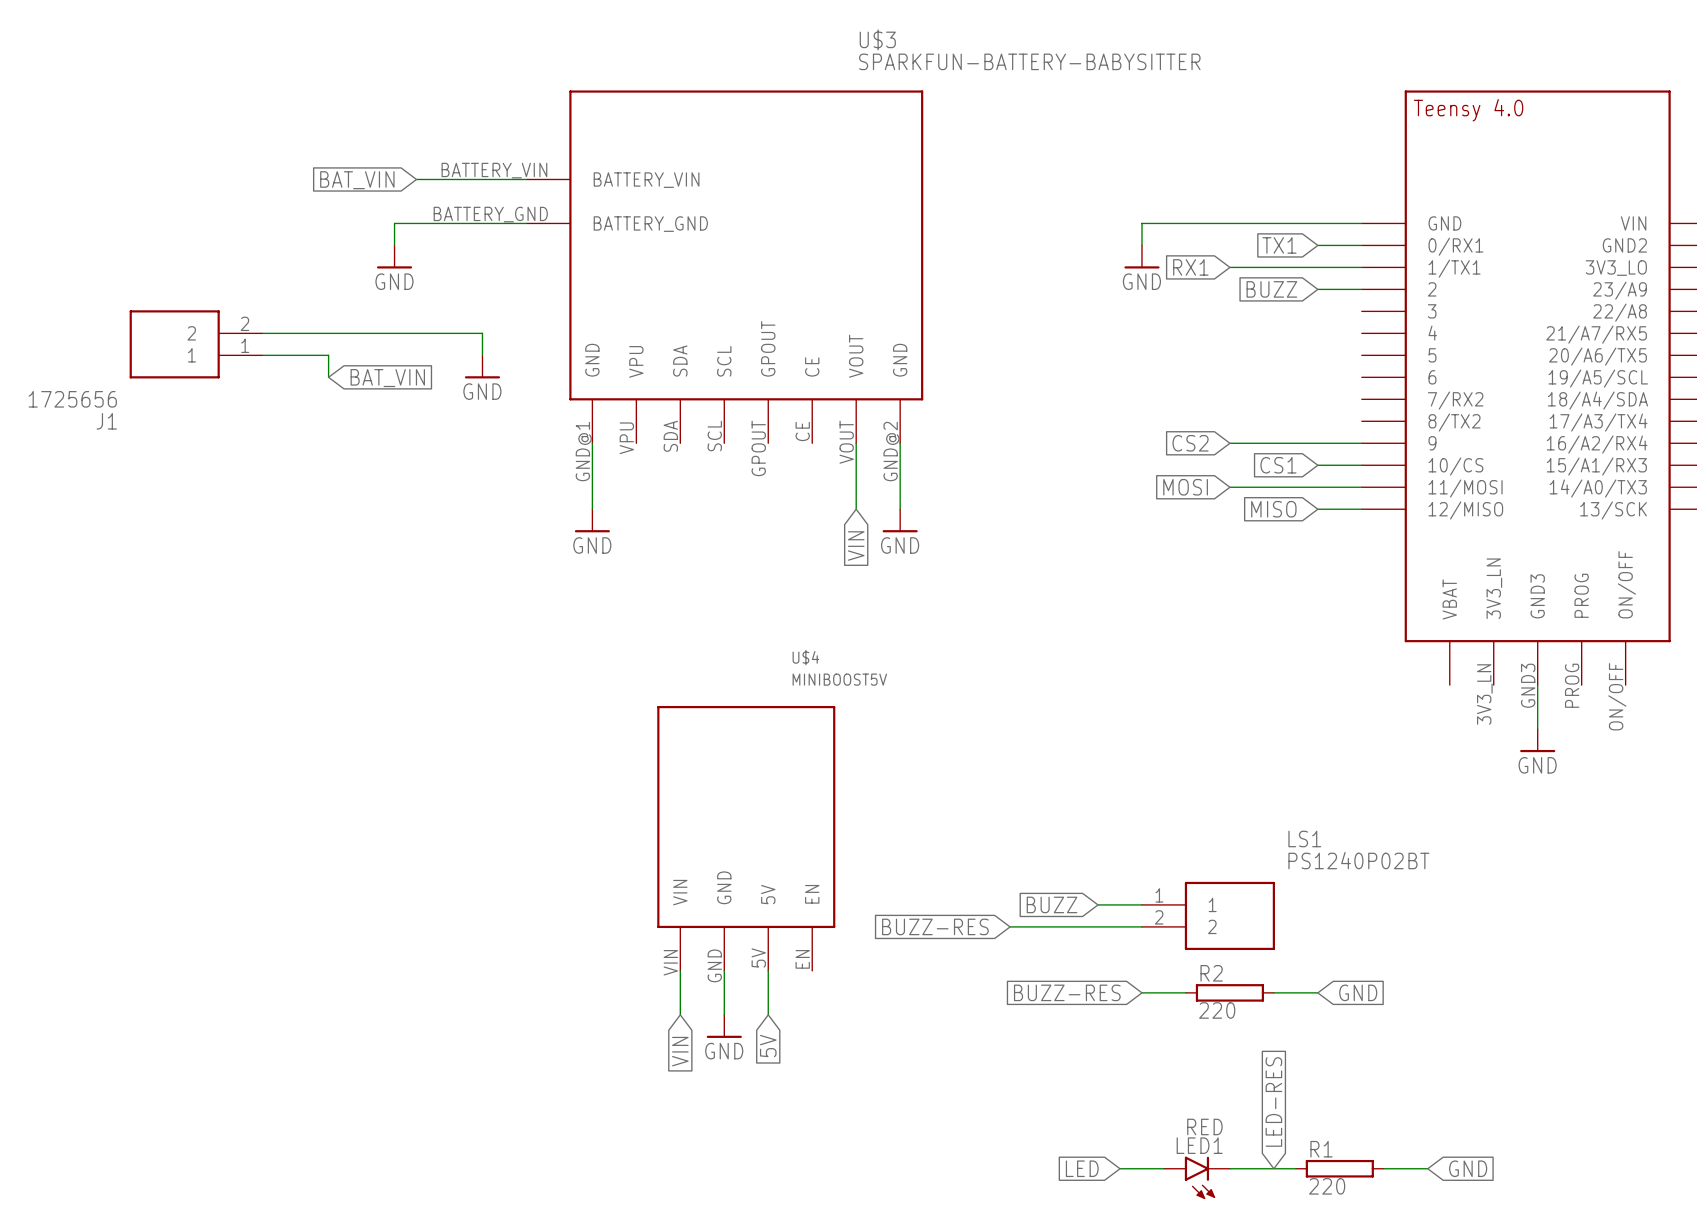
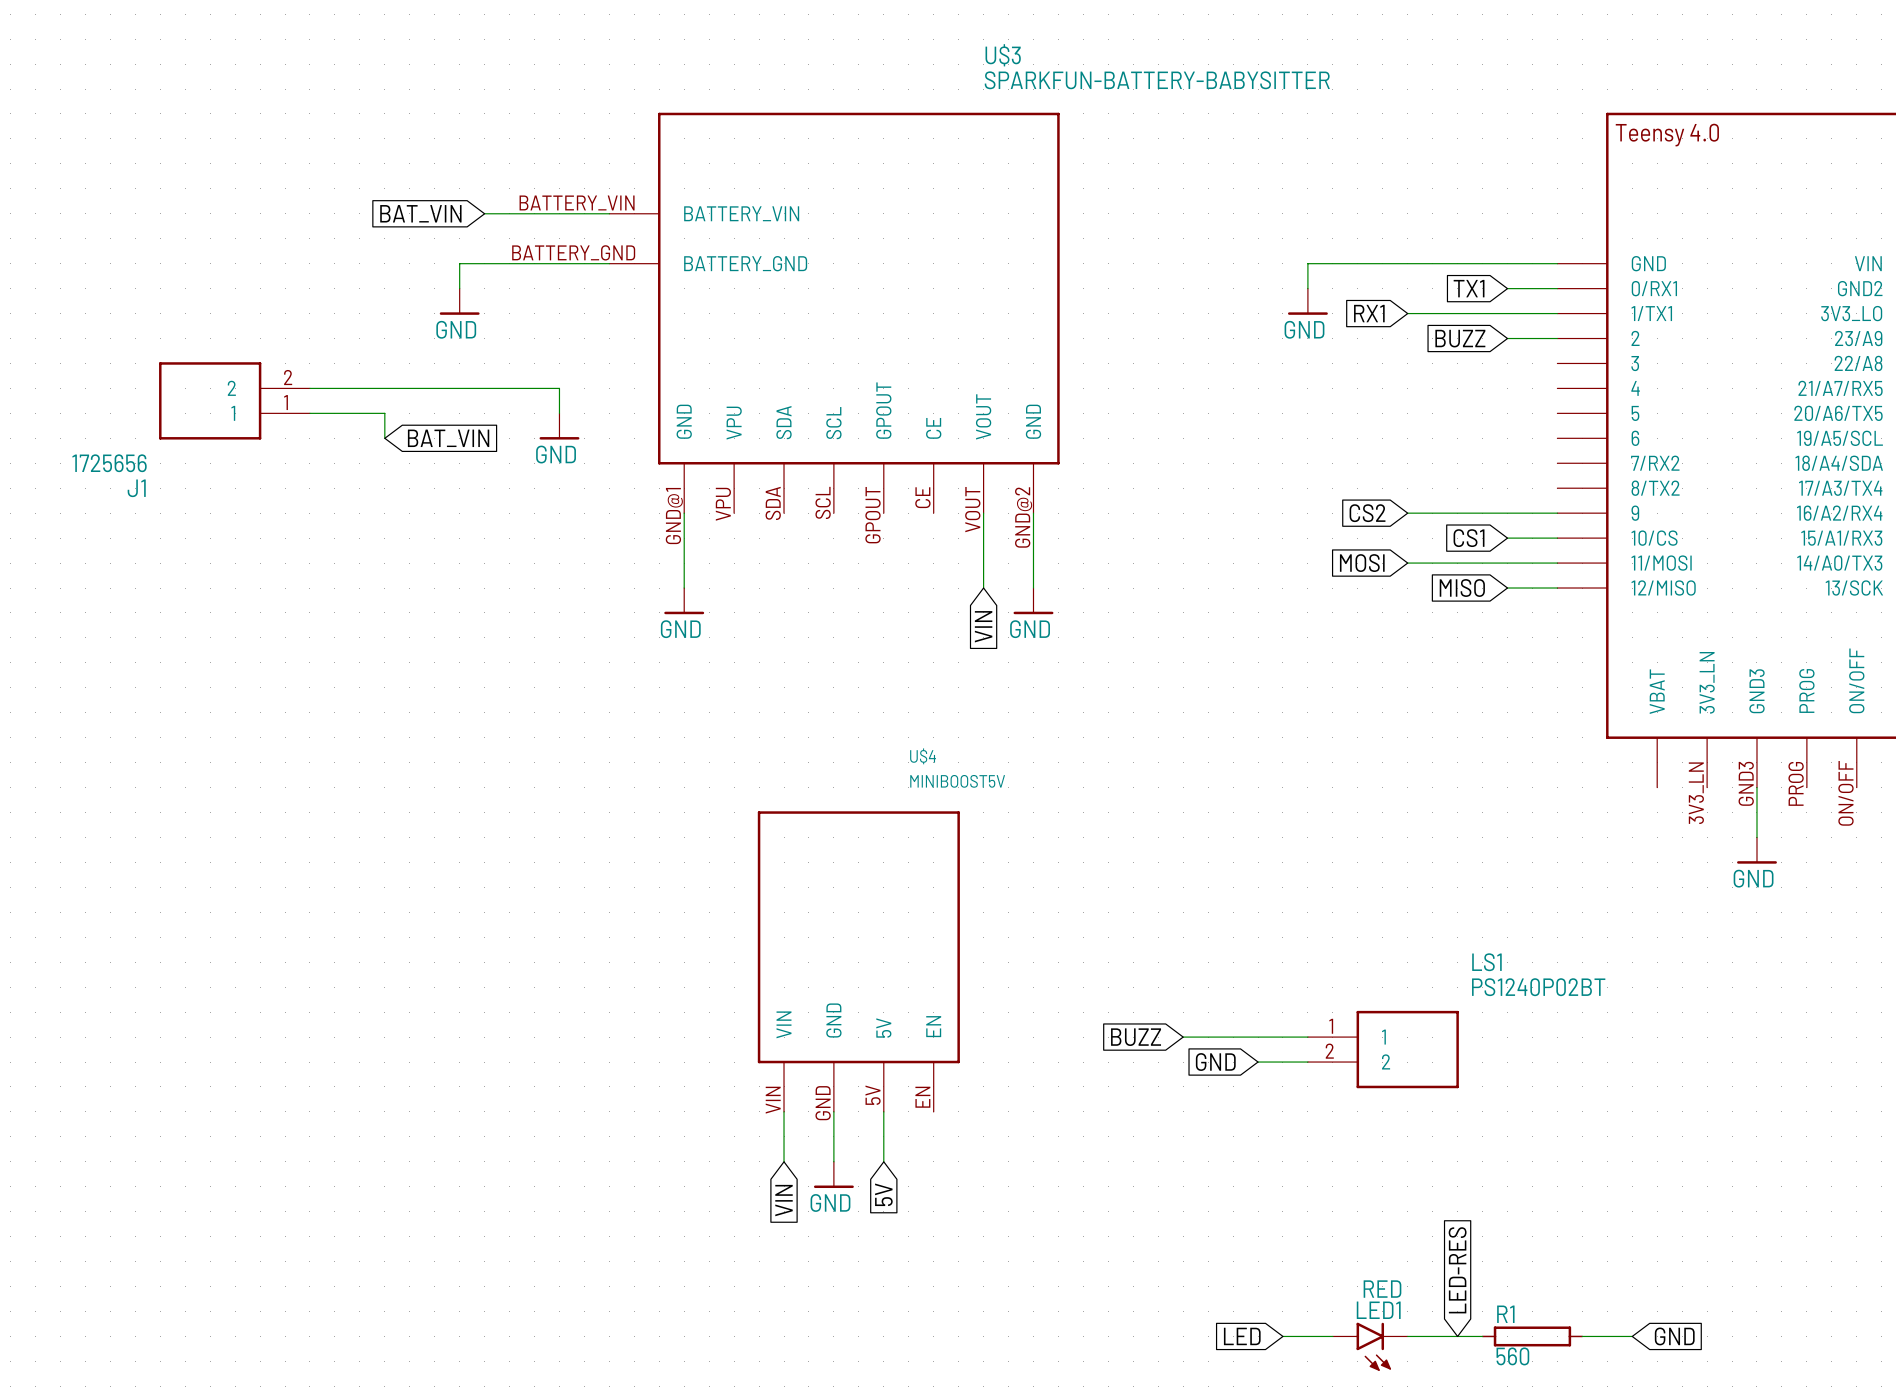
wire: none -> (1183, 1037) (1258, 1037)
global label position: BUZZ (1052, 904) -> BUZZ (1136, 1037)
global label: BUZZ-RES (935, 926) -> none
wire: (1010, 926) (1098, 926) -> none
global label: none -> GND (1215, 1062)
global label: BUZZ-RES (1067, 992) -> none
wire: (1141, 992) (1185, 992) -> none
R2: 220 (1229, 992) -> none
wire: (1273, 992) (1317, 992) -> none
global label: GND (1358, 992) -> none
R1 value: 220 (1327, 1186) -> 560 (1512, 1356)

